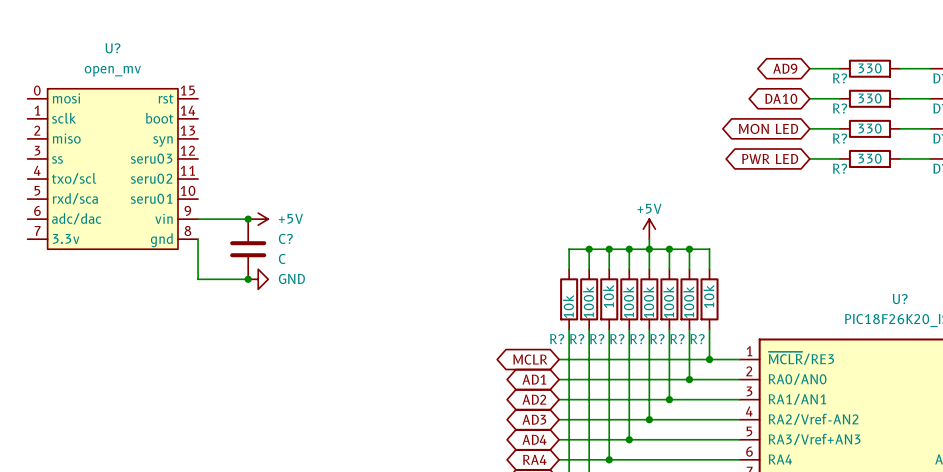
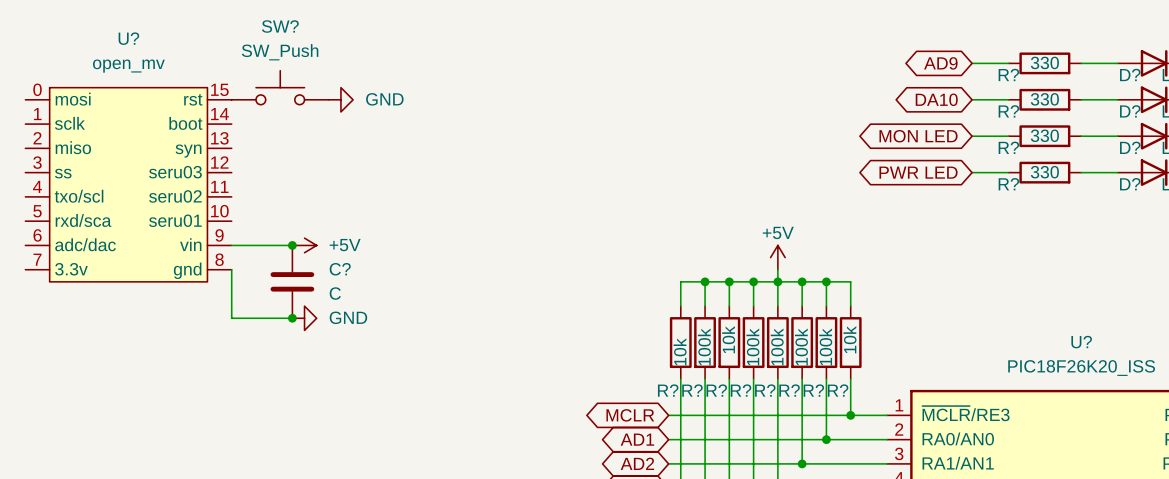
SW?: none -> SW_Push (280, 87)
power symbol: none -> GND (340, 99)

